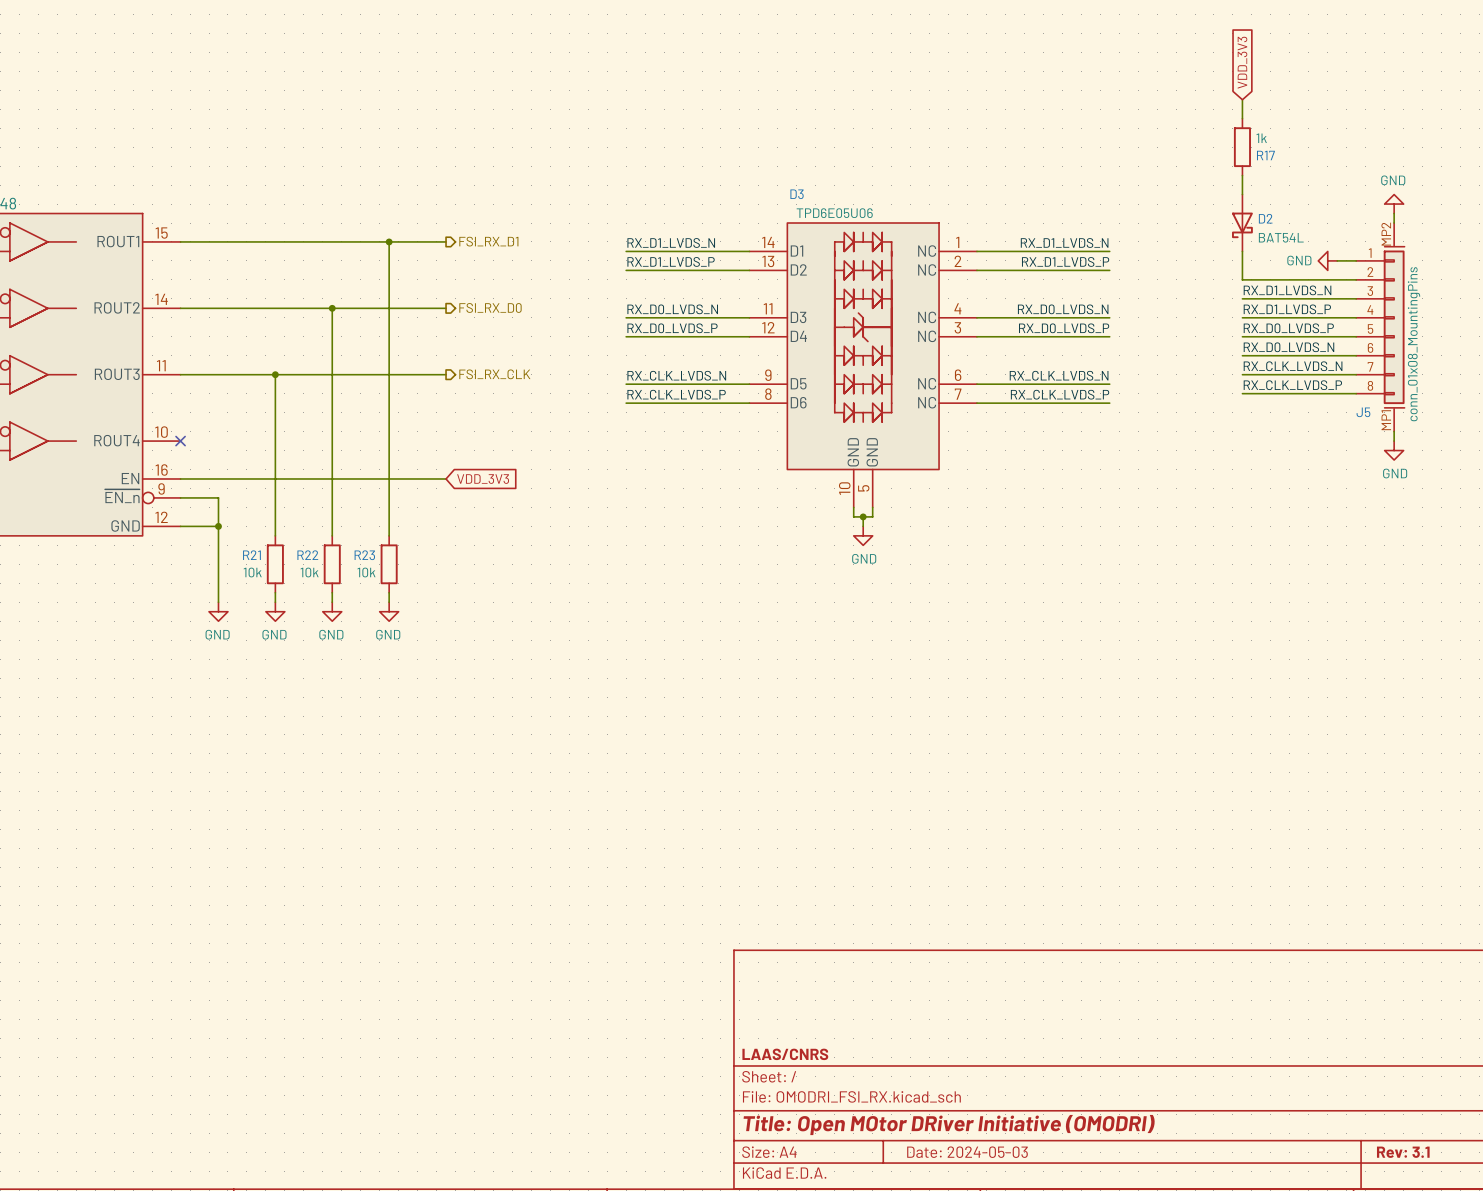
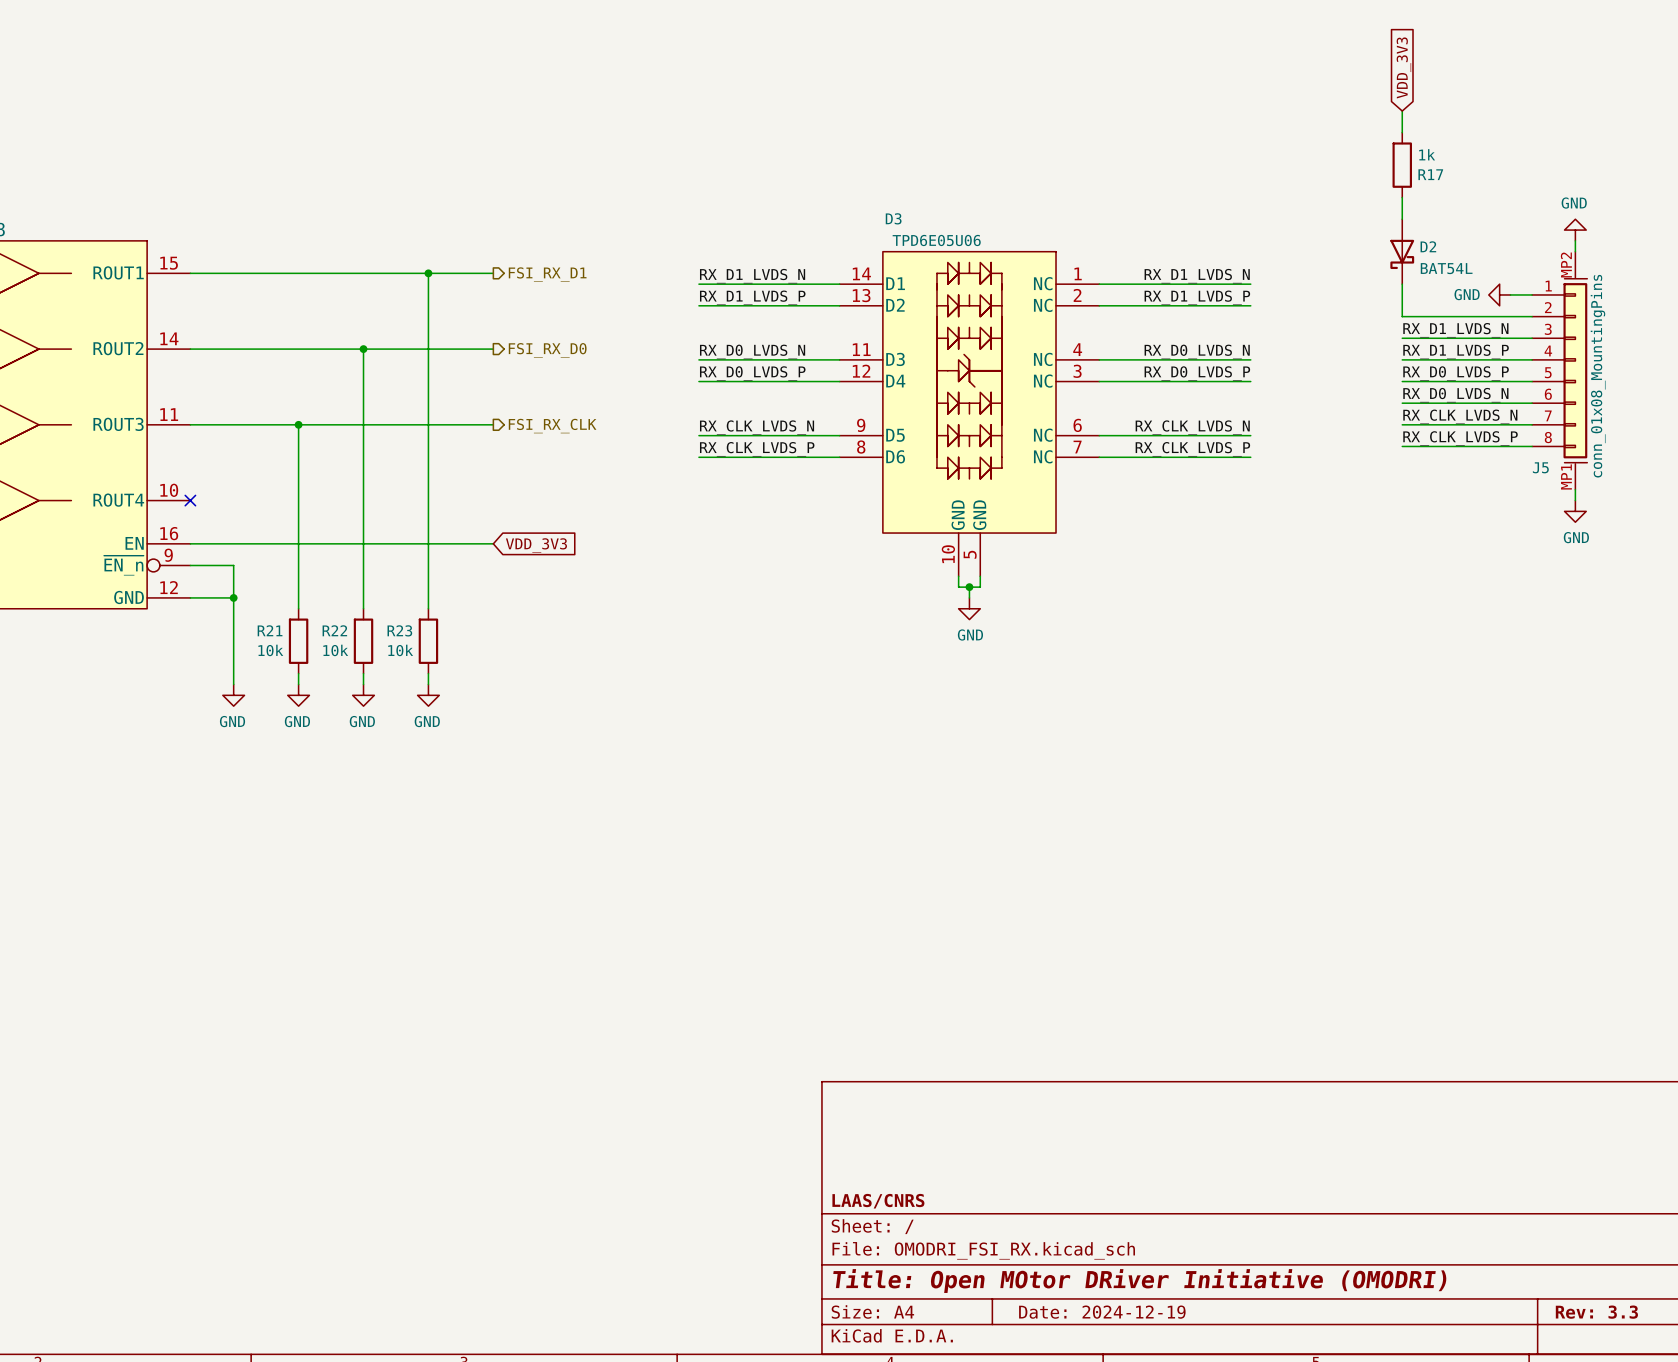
title block: Date: 2024-05-03 (967, 1152) -> Date: 2024-12-19 (1102, 1312)
title block: Rev: 3.1 (1403, 1152) -> Rev: 3.3 (1596, 1312)

